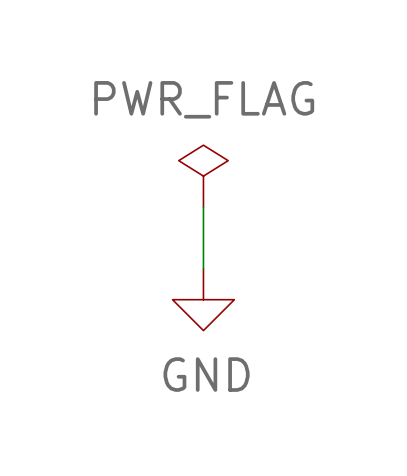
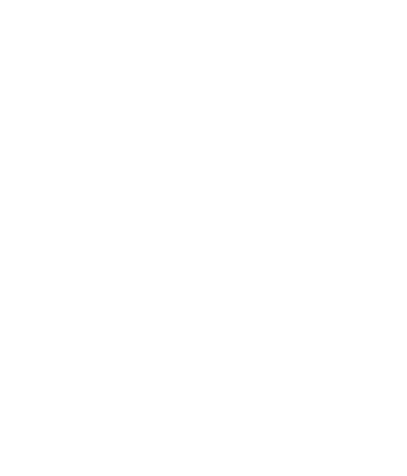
power symbol: PWR_FLAG (203, 176) -> none
wire: (203, 207) (203, 268) -> none
power symbol: GND (203, 299) -> none

